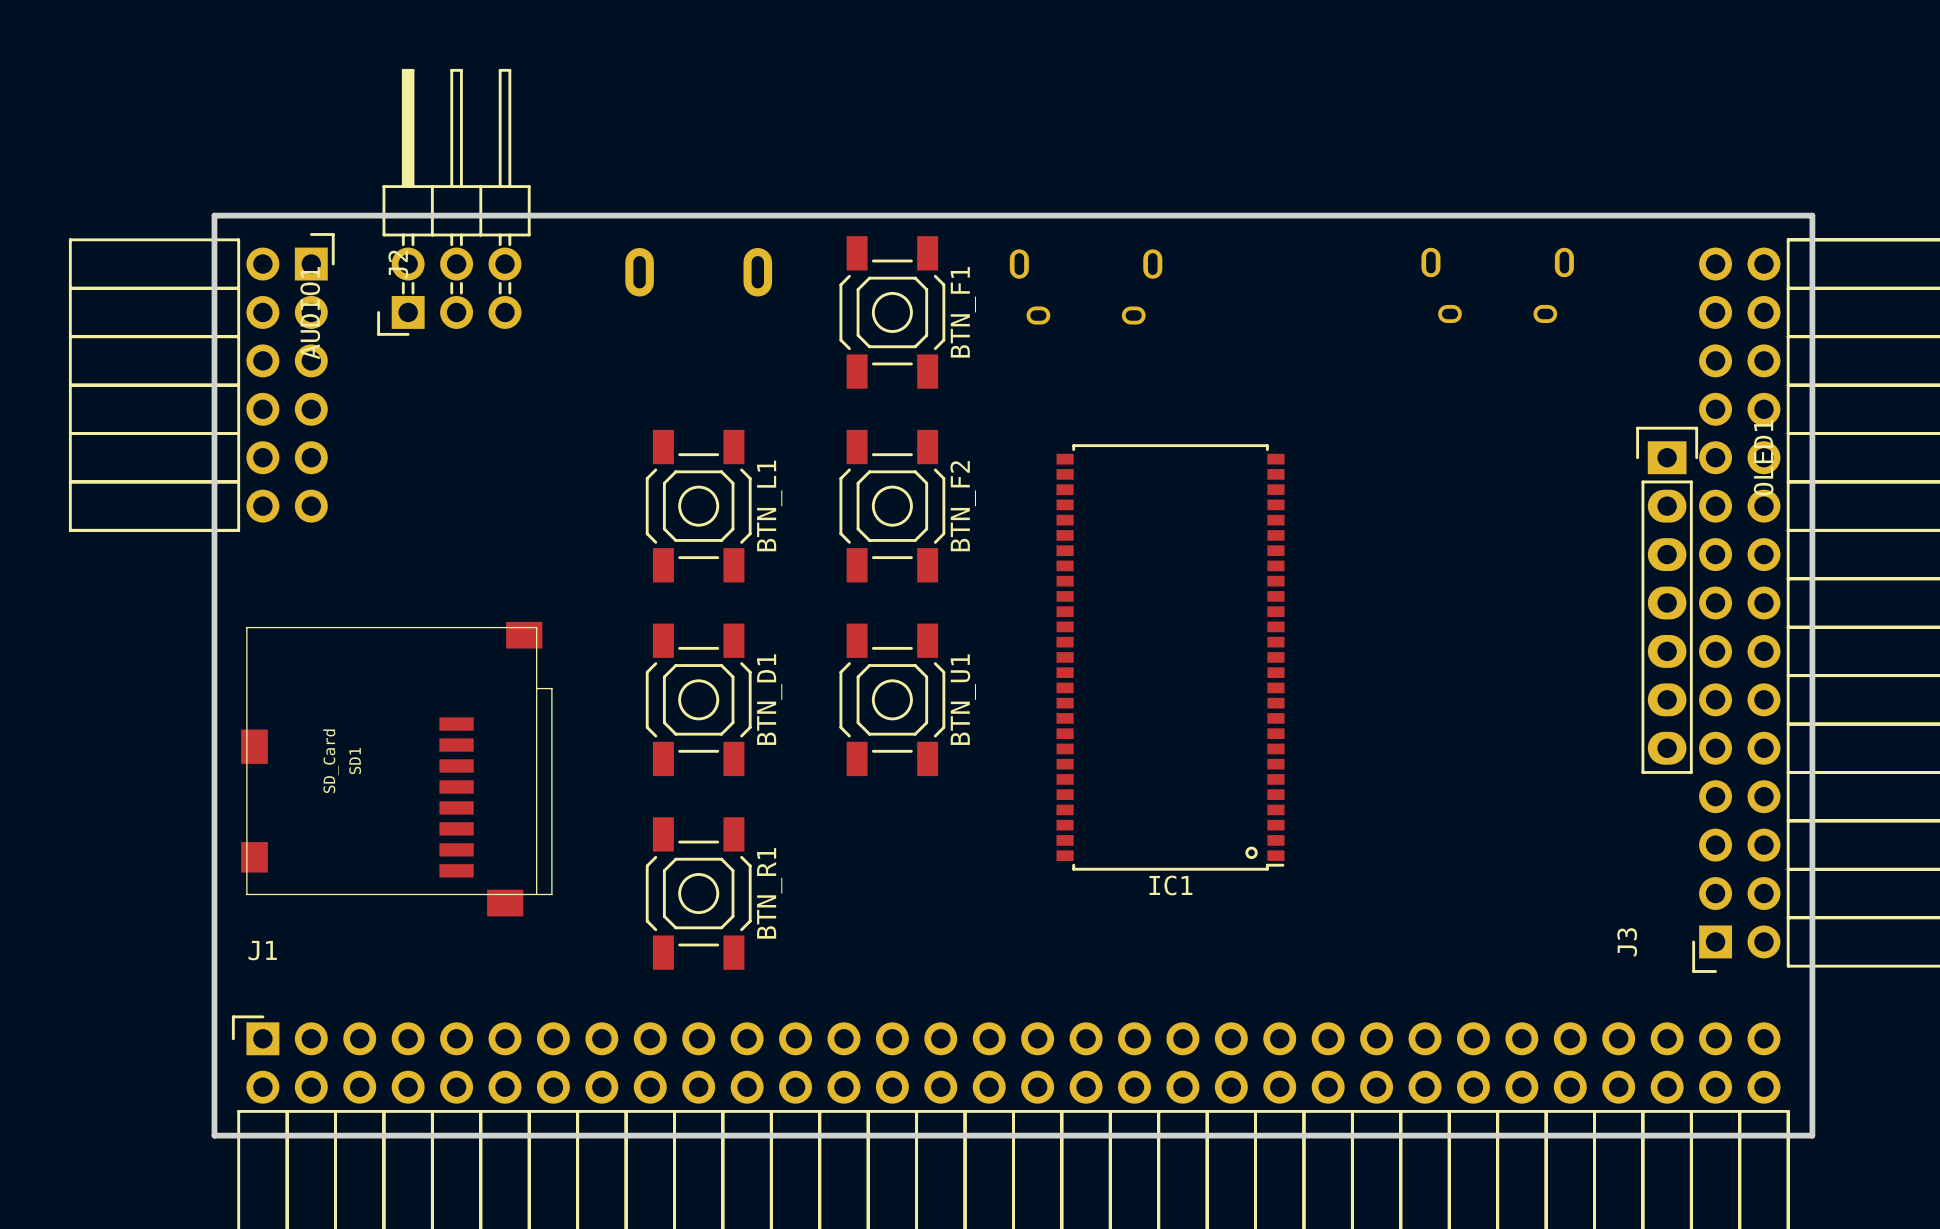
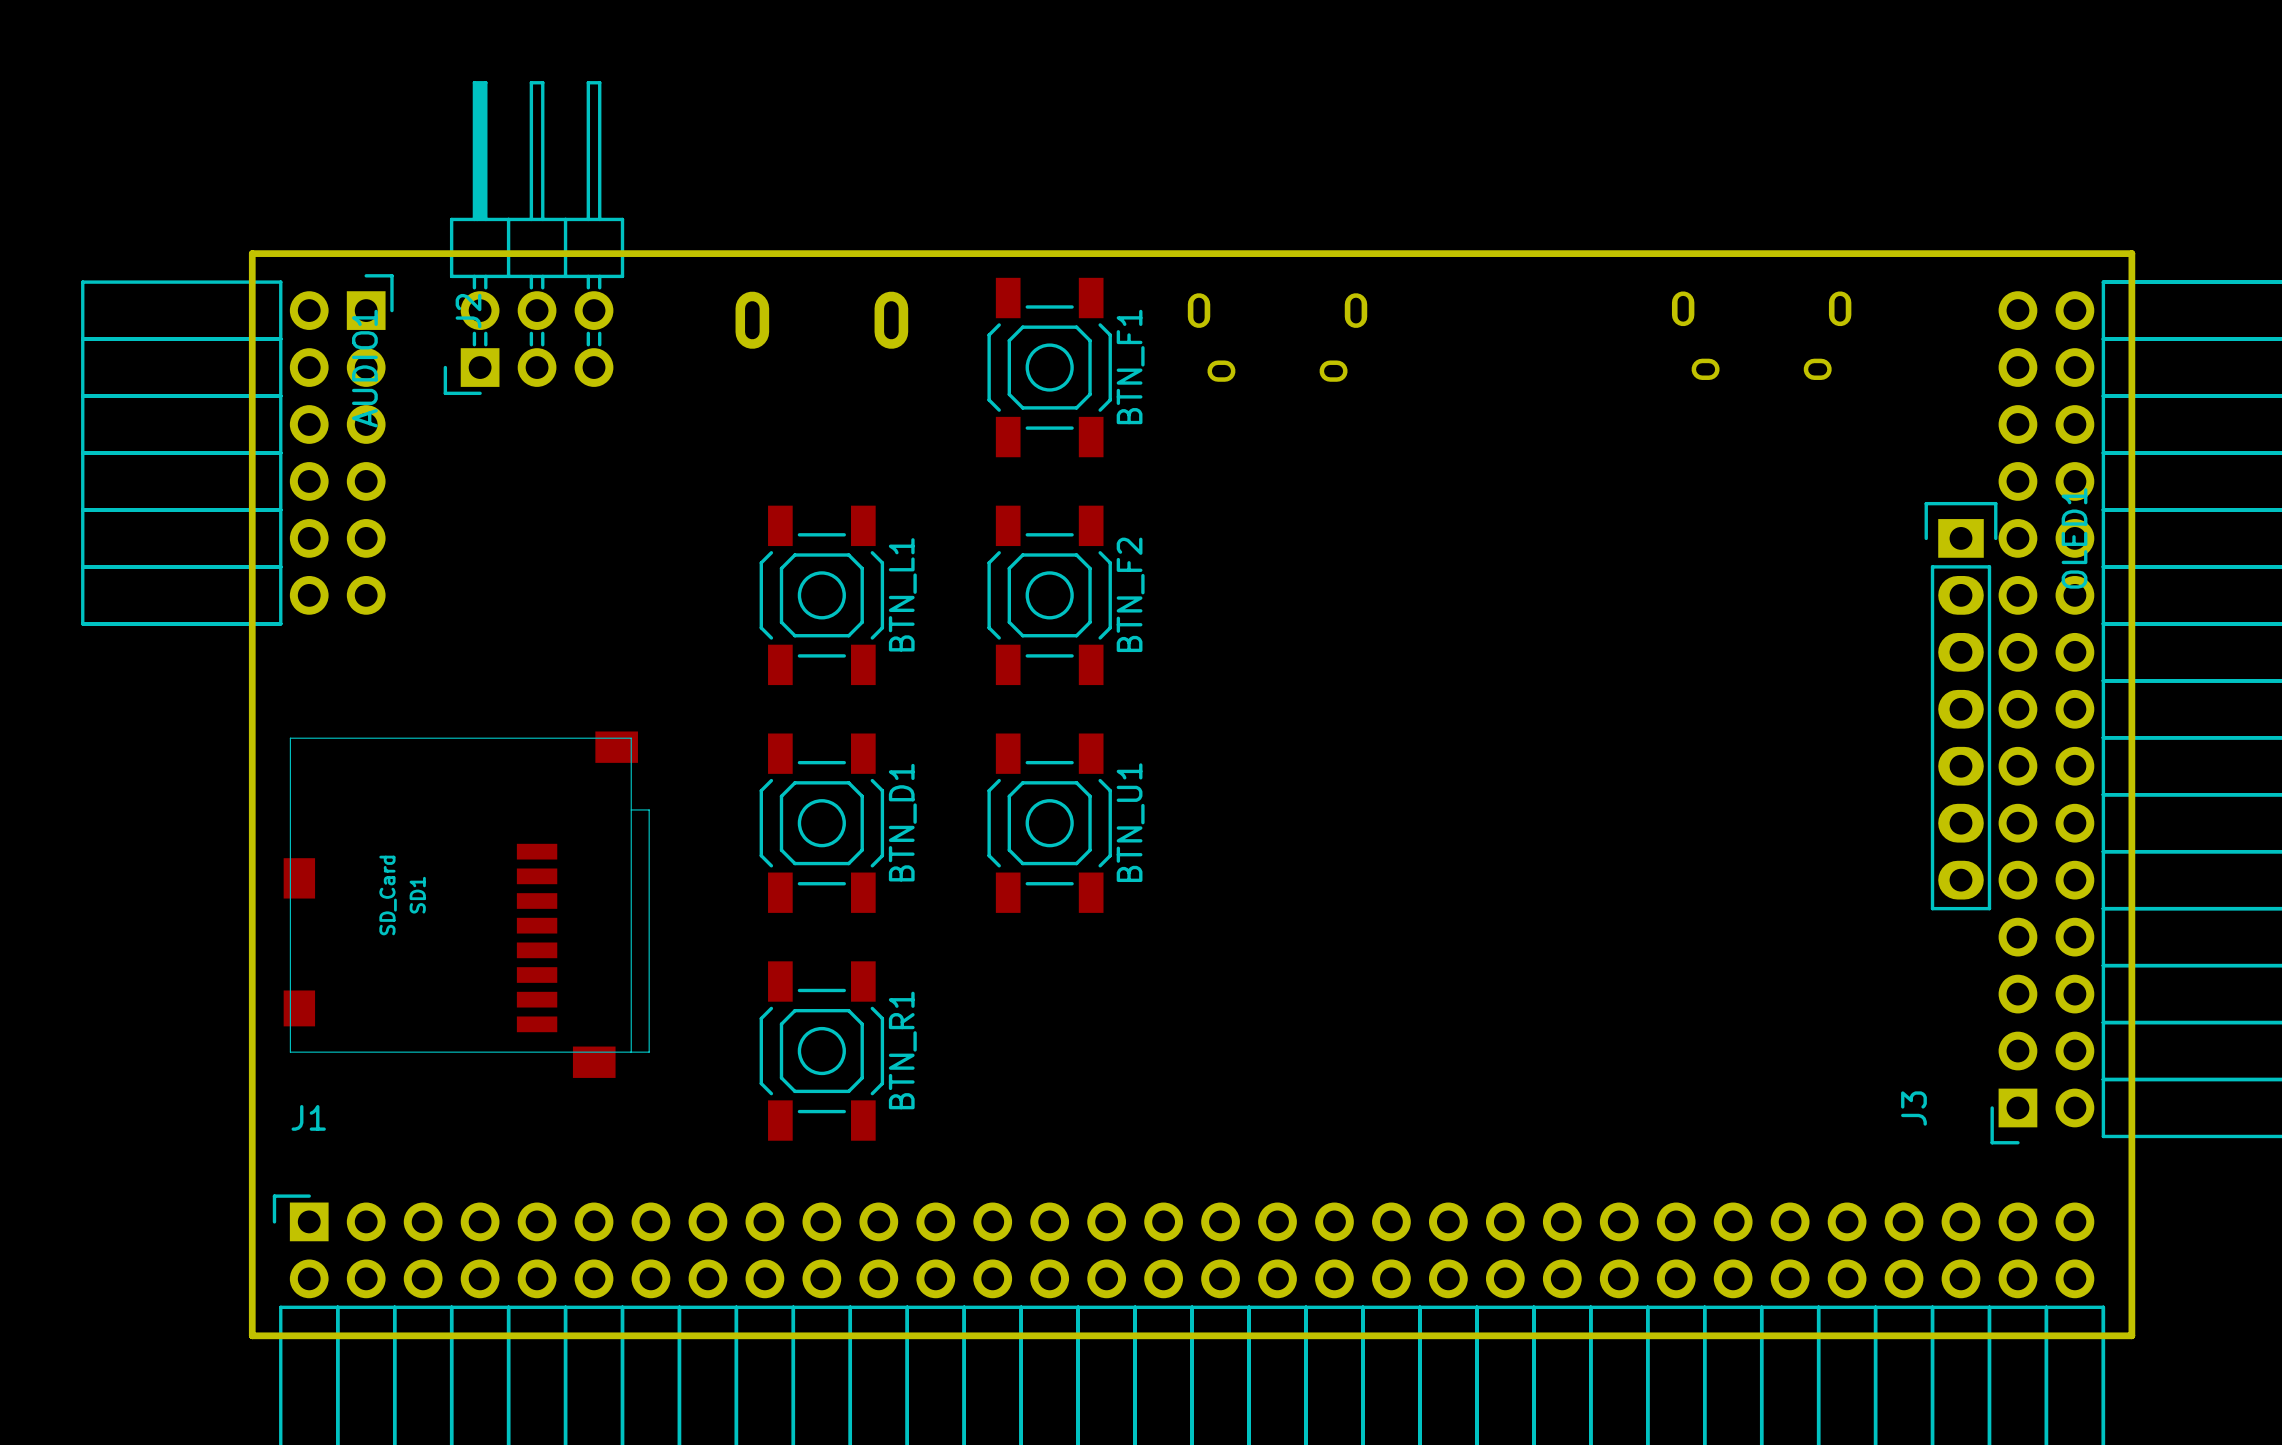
IC1: (1170, 657) -> none

